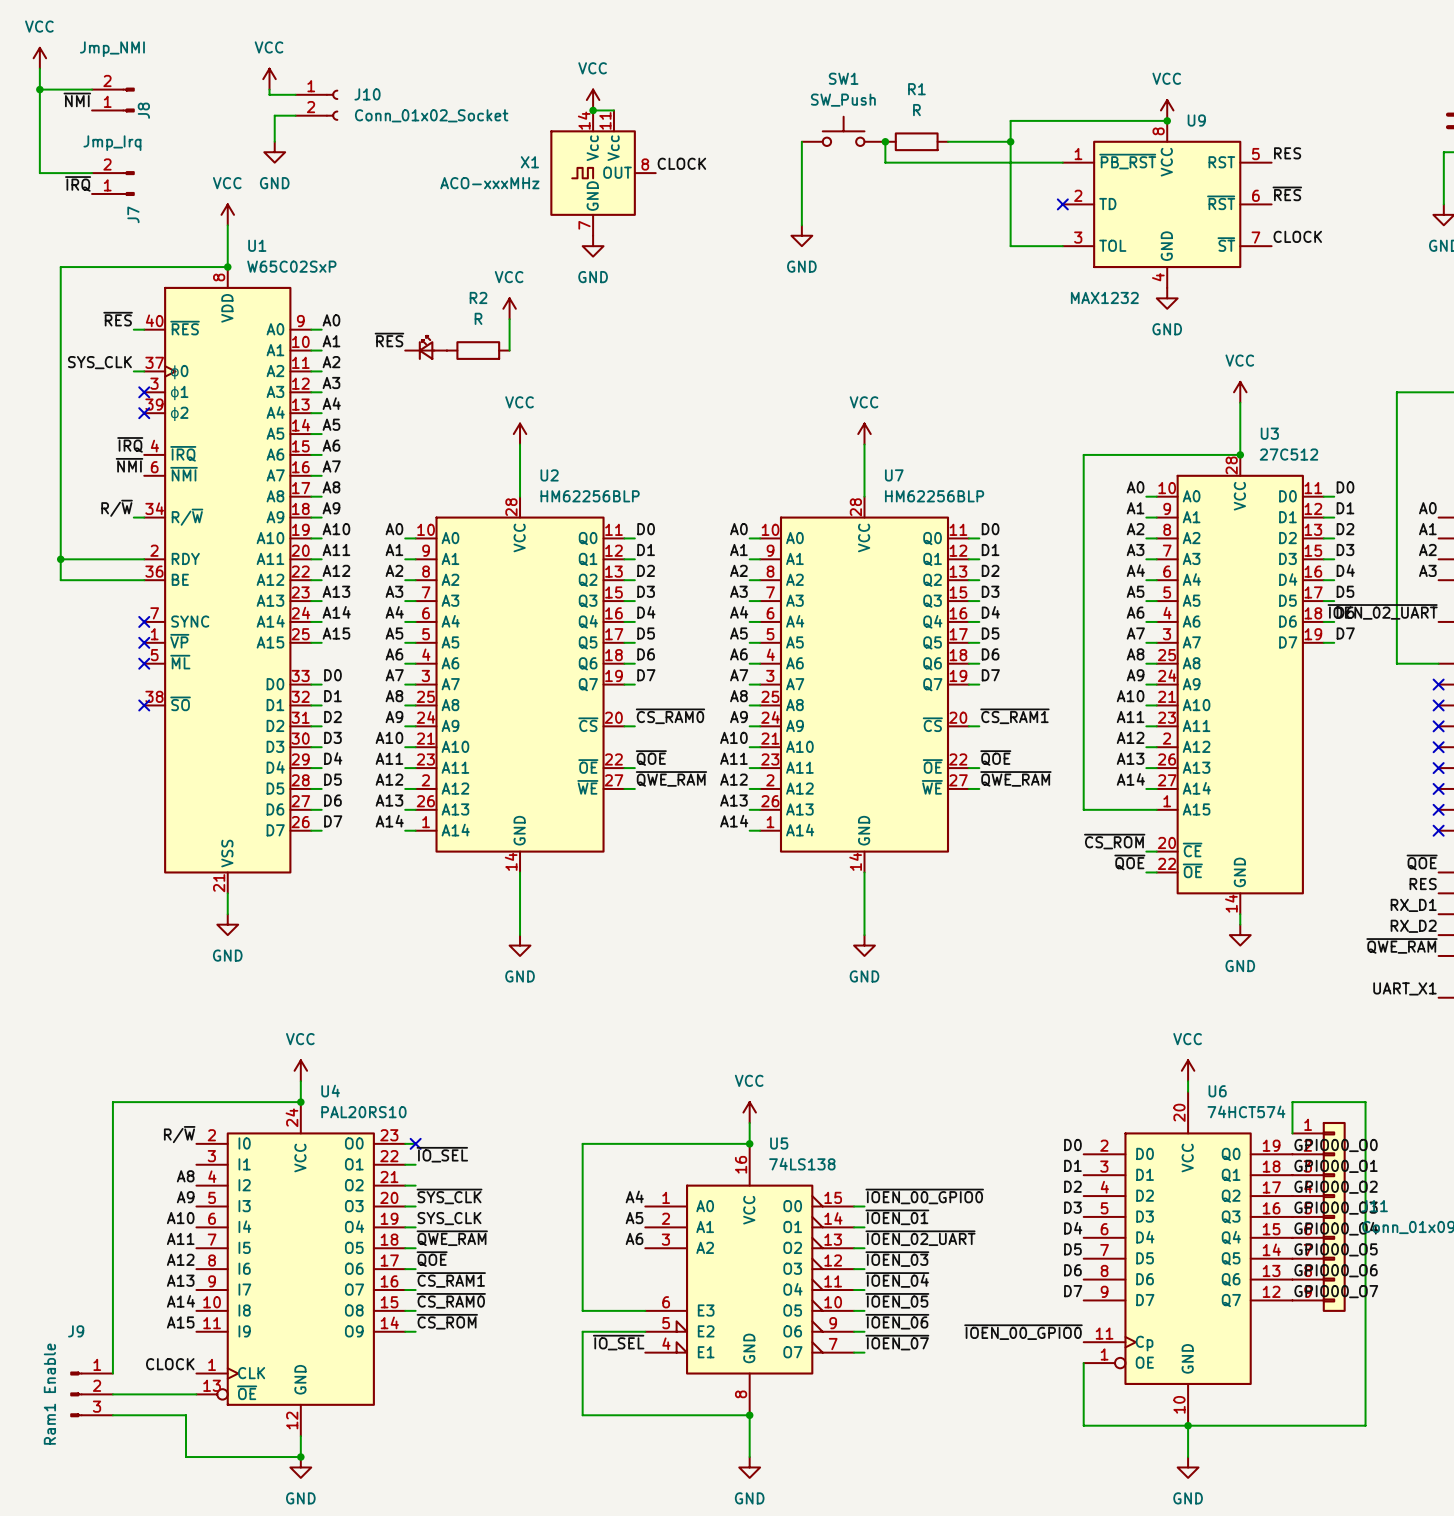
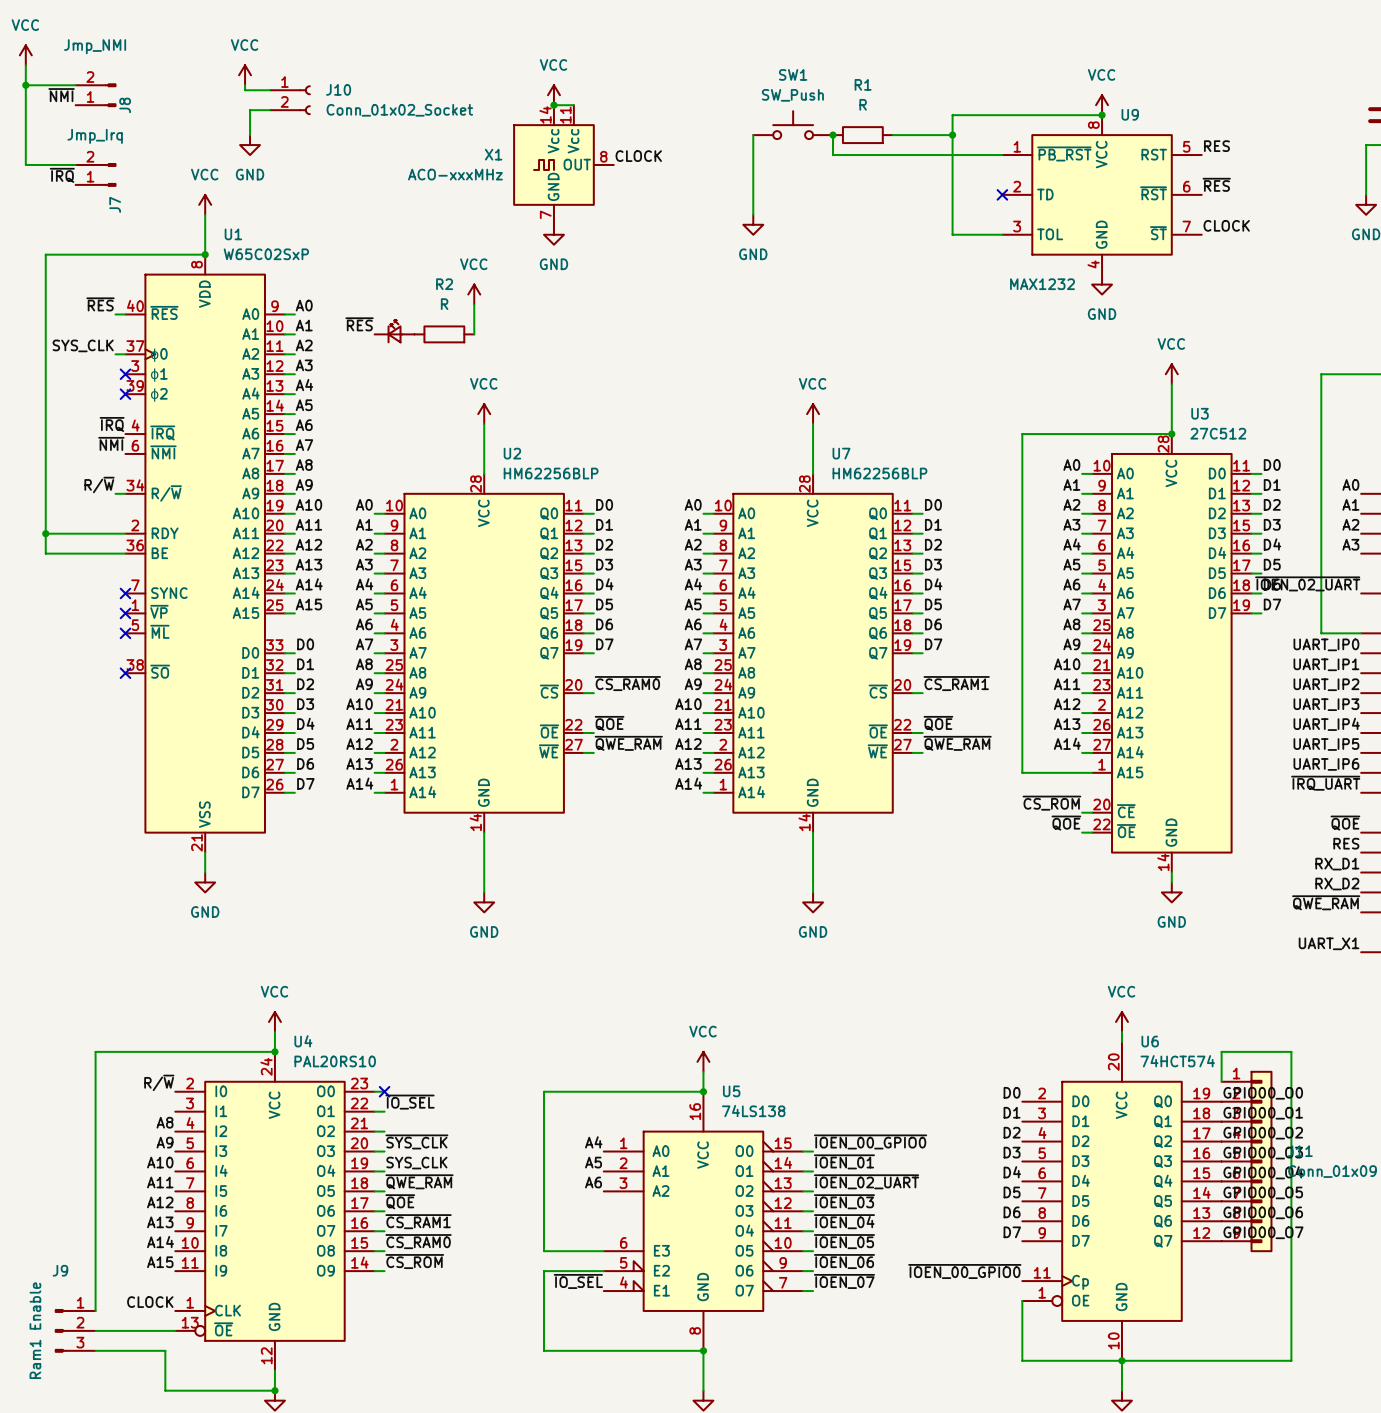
label: none -> UART_IP0 (1326, 644)
no-connect mark: (1438, 684) -> none
label: none -> UART_IP1 (1326, 664)
no-connect mark: (1438, 705) -> none
label: none -> UART_IP2 (1326, 684)
no-connect mark: (1438, 726) -> none
label: none -> UART_IP3 (1326, 704)
no-connect mark: (1438, 747) -> none
label: none -> UART_IP4 (1326, 724)
no-connect mark: (1438, 768) -> none
label: none -> UART_IP5 (1326, 744)
no-connect mark: (1438, 788) -> none
label: none -> UART_IP6 (1326, 764)
no-connect mark: (1438, 809) -> none
label: none -> ~{IRQ_UART} (1325, 783)
no-connect mark: (1438, 830) -> none

